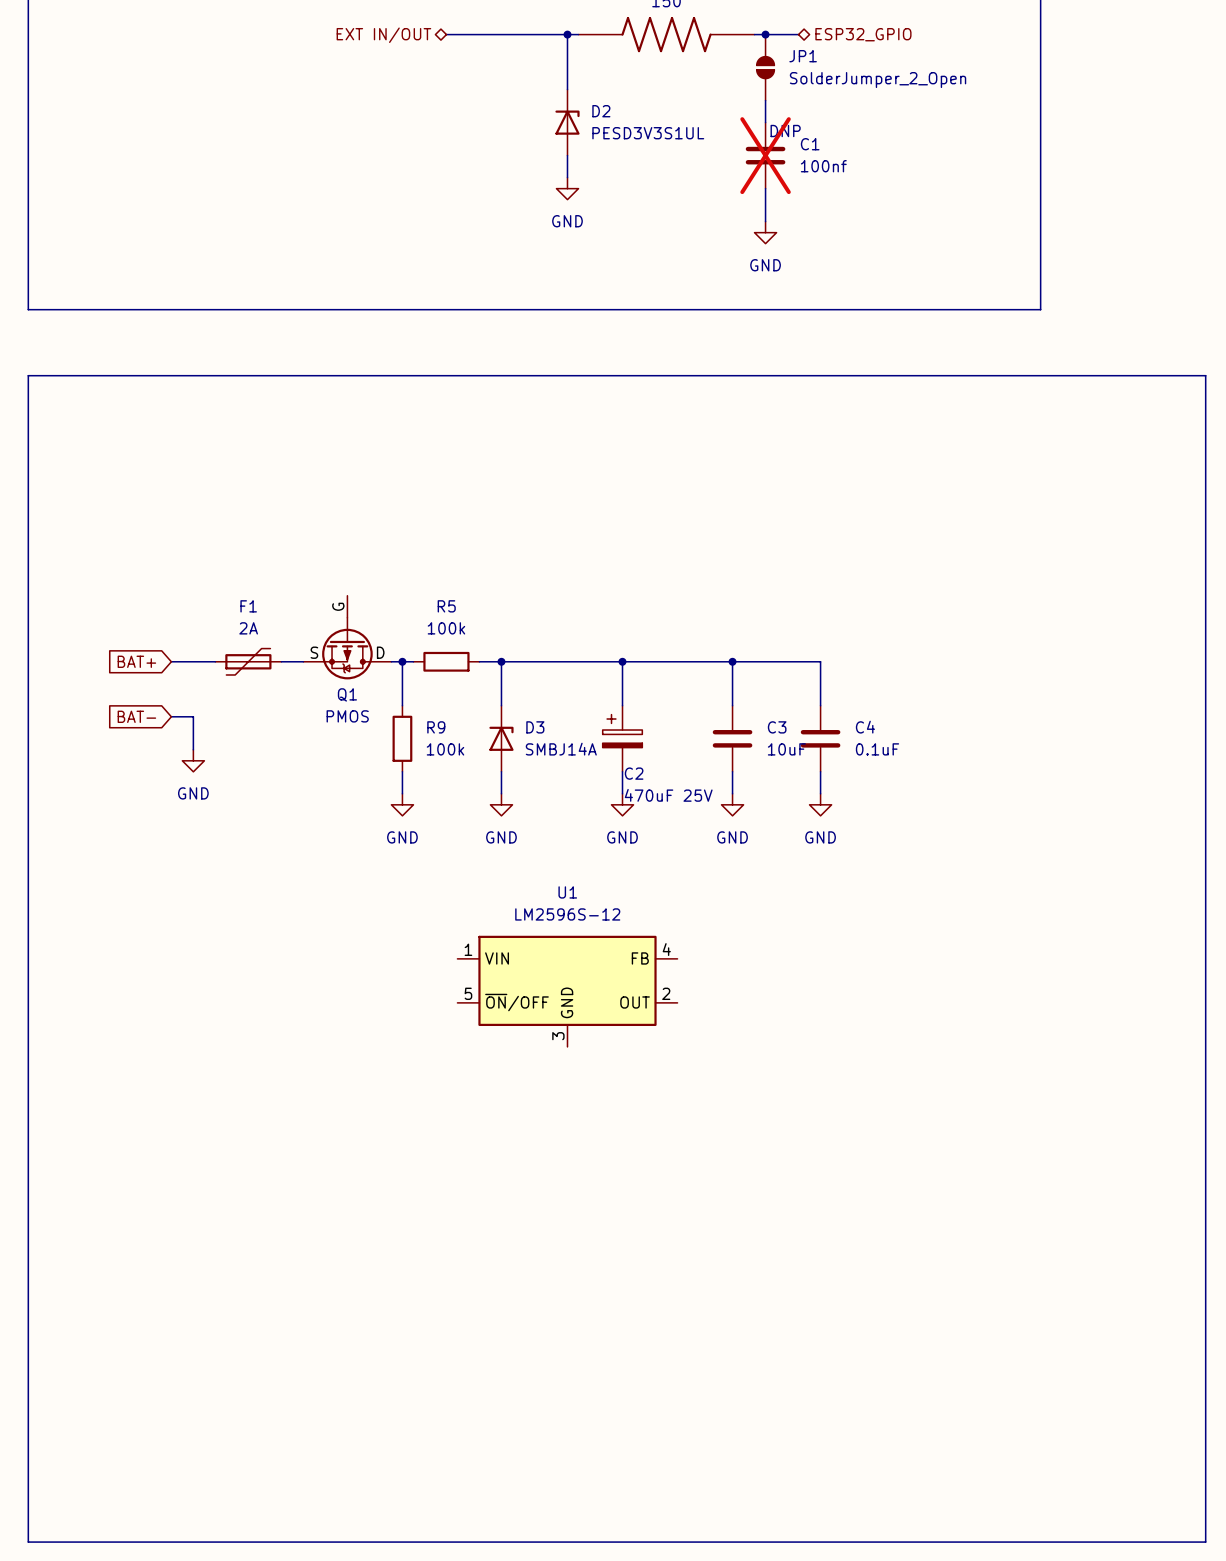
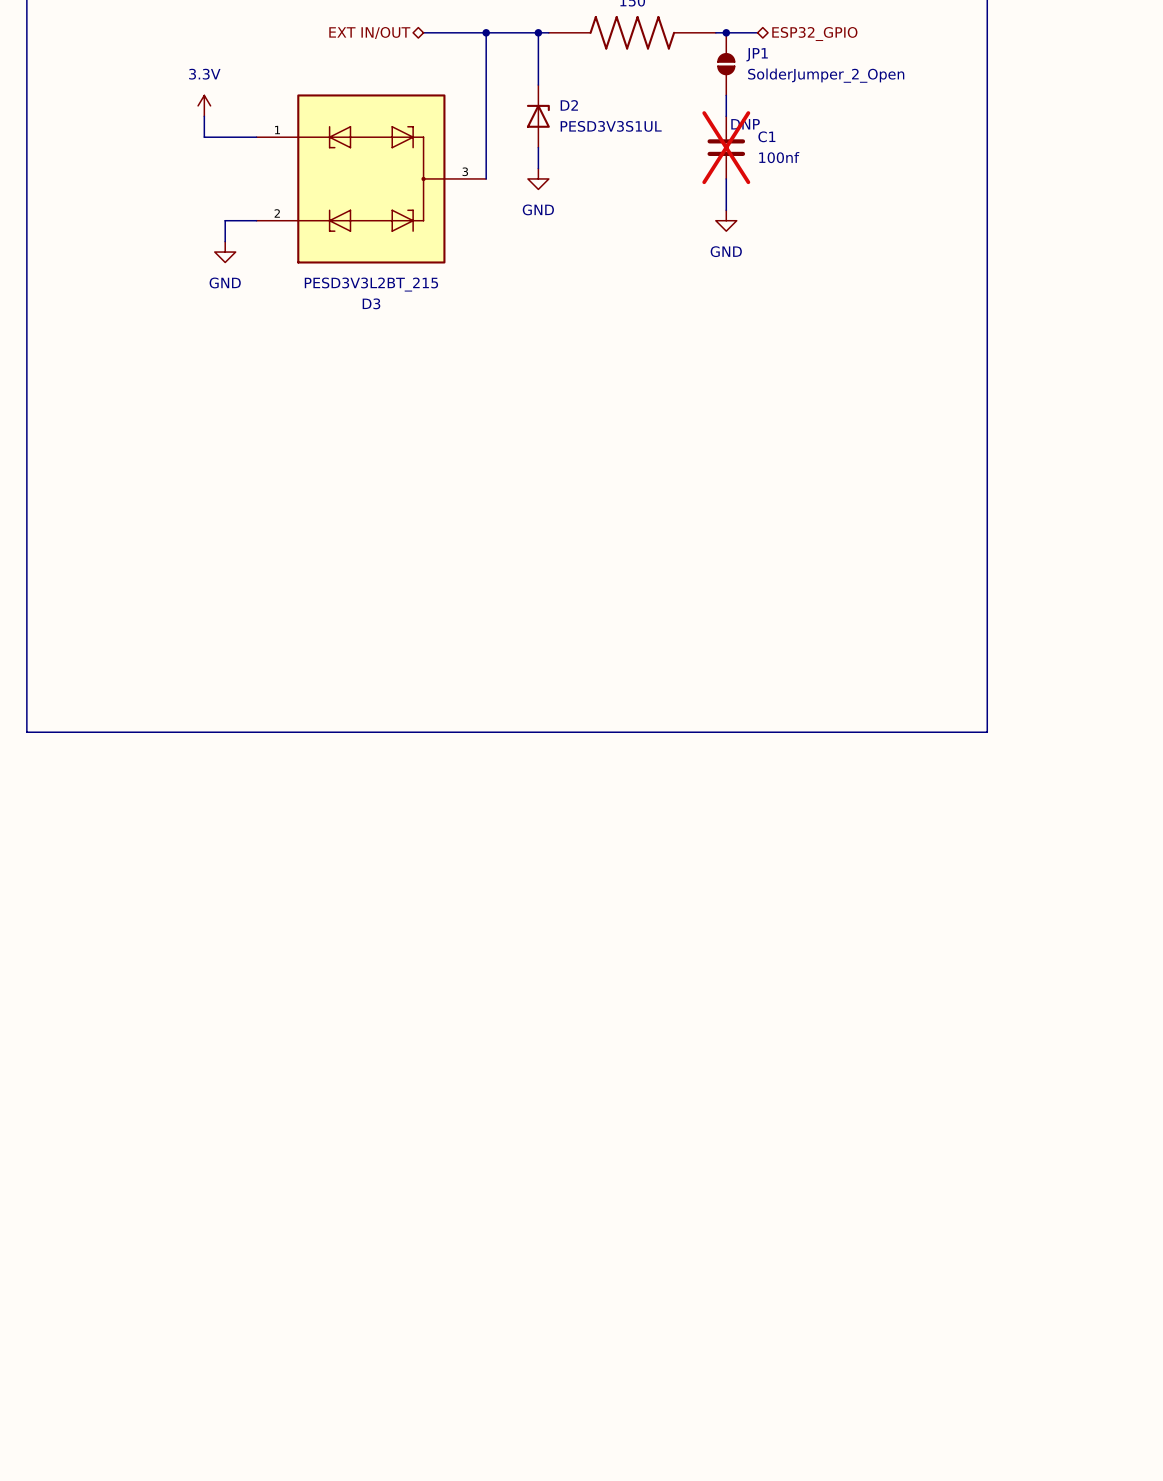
wire: none -> (486, 32) (486, 178)
junction: none -> (486, 32)
power symbol: none -> 3.3V (204, 105)
wire: none -> (204, 116) (204, 137) (256, 137)
wire: none -> (256, 220) (225, 220) (225, 241)
power symbol: none -> GND (225, 252)
line: (28, 309) (1040, 309) -> (26, 732) (987, 732) (987, 293)
line: (28, 375) (1205, 375) (1205, 1542) (28, 1542) (28, 771) -> (26, 356) (26, 293)
Q1: PMOS (347, 637) -> none
global label: BAT+ (136, 661) -> none
wire: (171, 661) (215, 661) -> none
F1: 2A (248, 661) -> none
wire: (281, 661) (303, 661) -> none
wire: (391, 661) (413, 661) -> none
wire: (402, 661) (402, 705) -> none
junction: (402, 661) -> none
R5: 100k (446, 661) -> none
wire: (479, 661) (820, 661) (820, 705) -> none
wire: (501, 661) (501, 705) -> none
junction: (501, 661) -> none
wire: (622, 661) (622, 705) -> none
junction: (622, 661) -> none
wire: (732, 661) (732, 705) -> none
junction: (732, 661) -> none
D3 symbol: [489, 705, 514, 772] -> [256, 94, 487, 264]
global label: BAT- (136, 716) -> none
wire: (171, 716) (193, 716) (193, 749) -> none
D3 name position: D3 (535, 727) -> D3 (371, 303)
R9: 100k (402, 738) -> none
C2: 470uF 25V (622, 738) -> none
C3: 10uF (732, 738) -> none
C4: 0.1uF (820, 738) -> none
D3 value: SMBJ14A (561, 749) -> PESD3V3L2BT_215 (371, 284)
power symbol: GND (193, 760) -> none
wire: (402, 771) (402, 793) -> none
wire: (501, 771) (501, 793) -> none
wire: (622, 771) (622, 793) -> none
wire: (732, 771) (732, 793) -> none
wire: (820, 771) (820, 793) -> none
power symbol: GND (402, 804) -> none
power symbol: GND (501, 804) -> none
power symbol: GND (622, 804) -> none
power symbol: GND (732, 804) -> none
power symbol: GND (820, 804) -> none
U1: LM2596S-12 (567, 991) -> none

